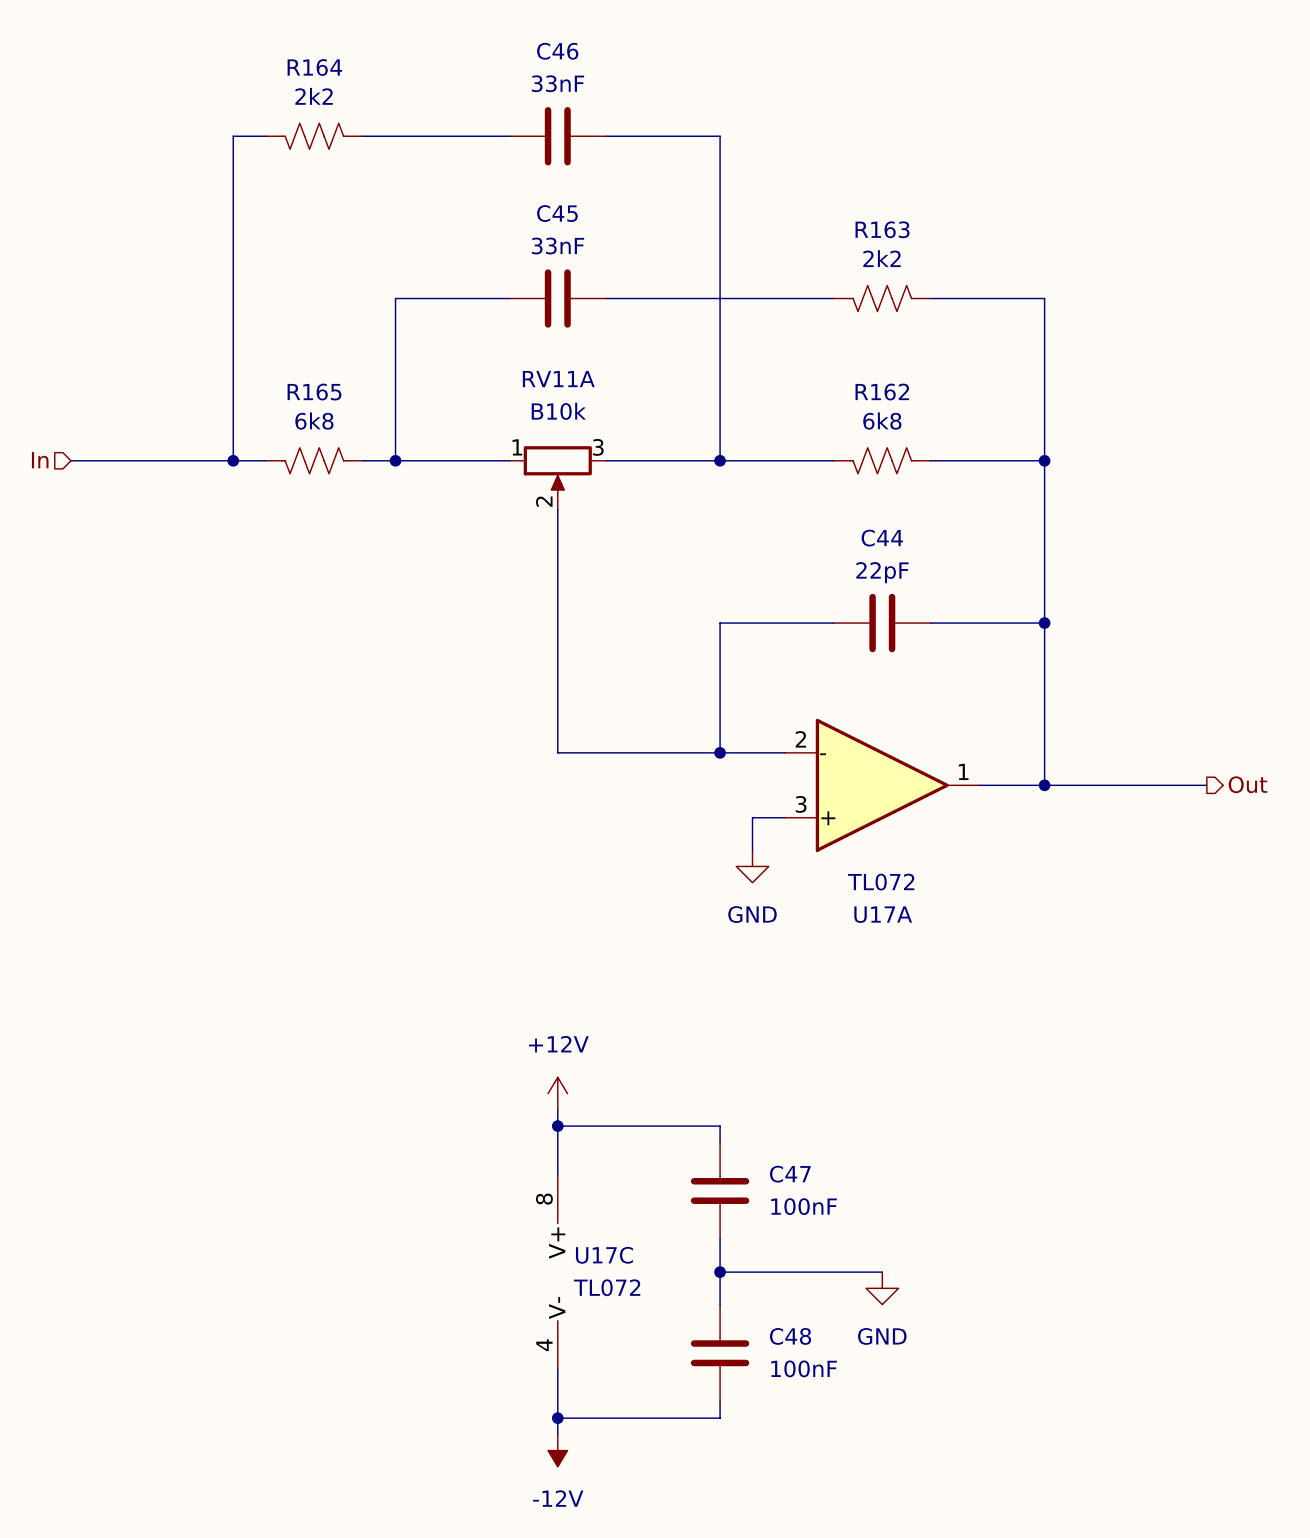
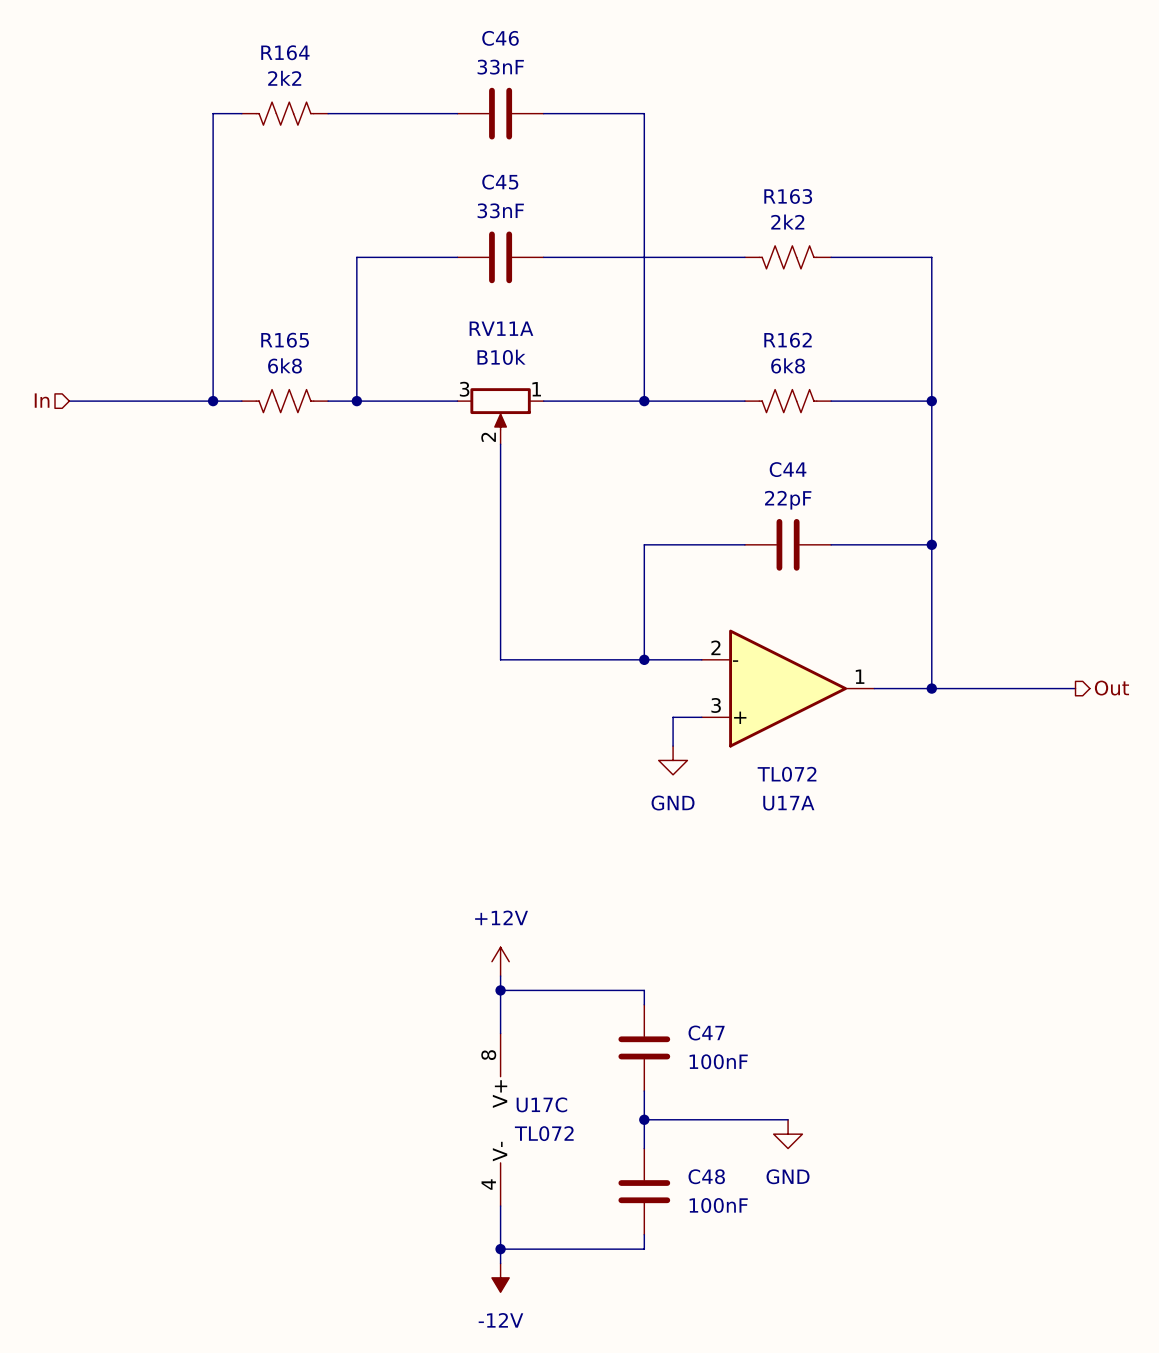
RV11A flip: as is (557, 469) -> left-right (500, 409)

